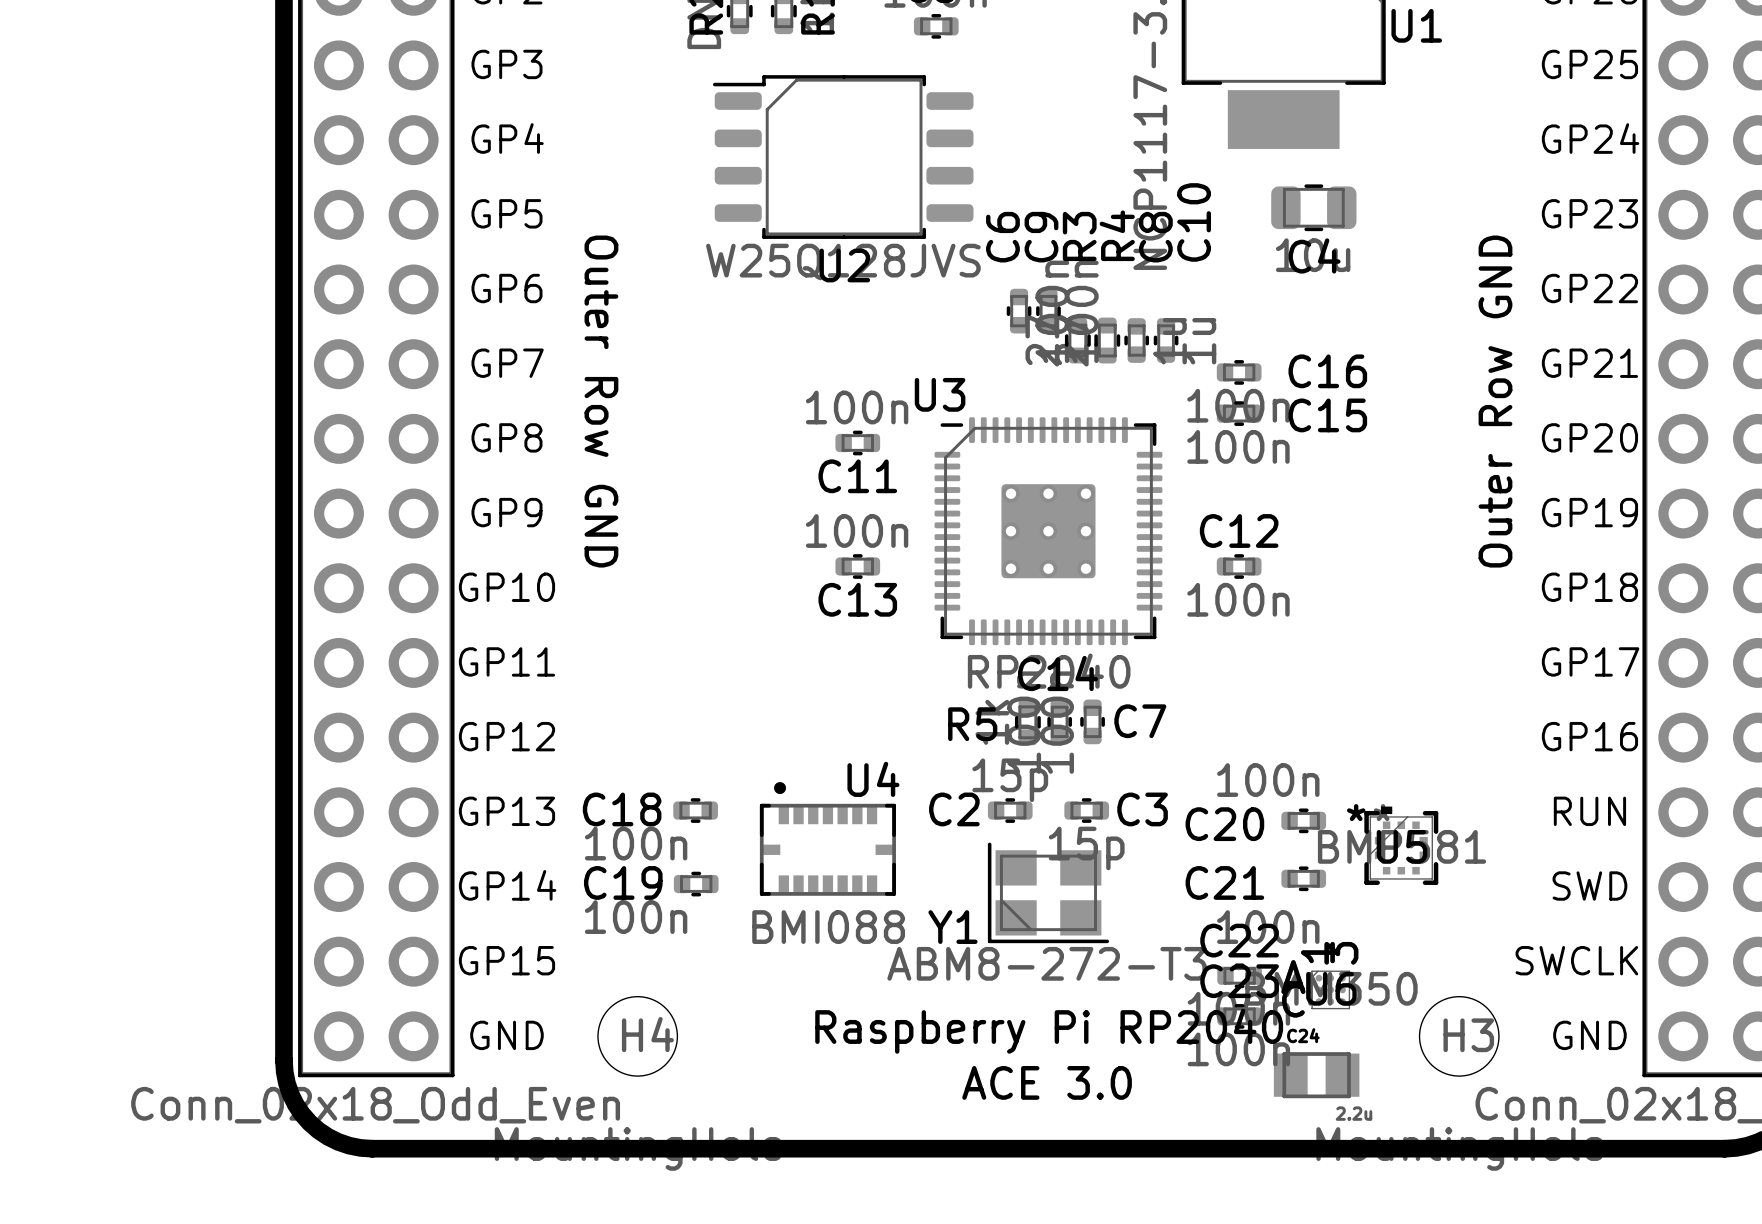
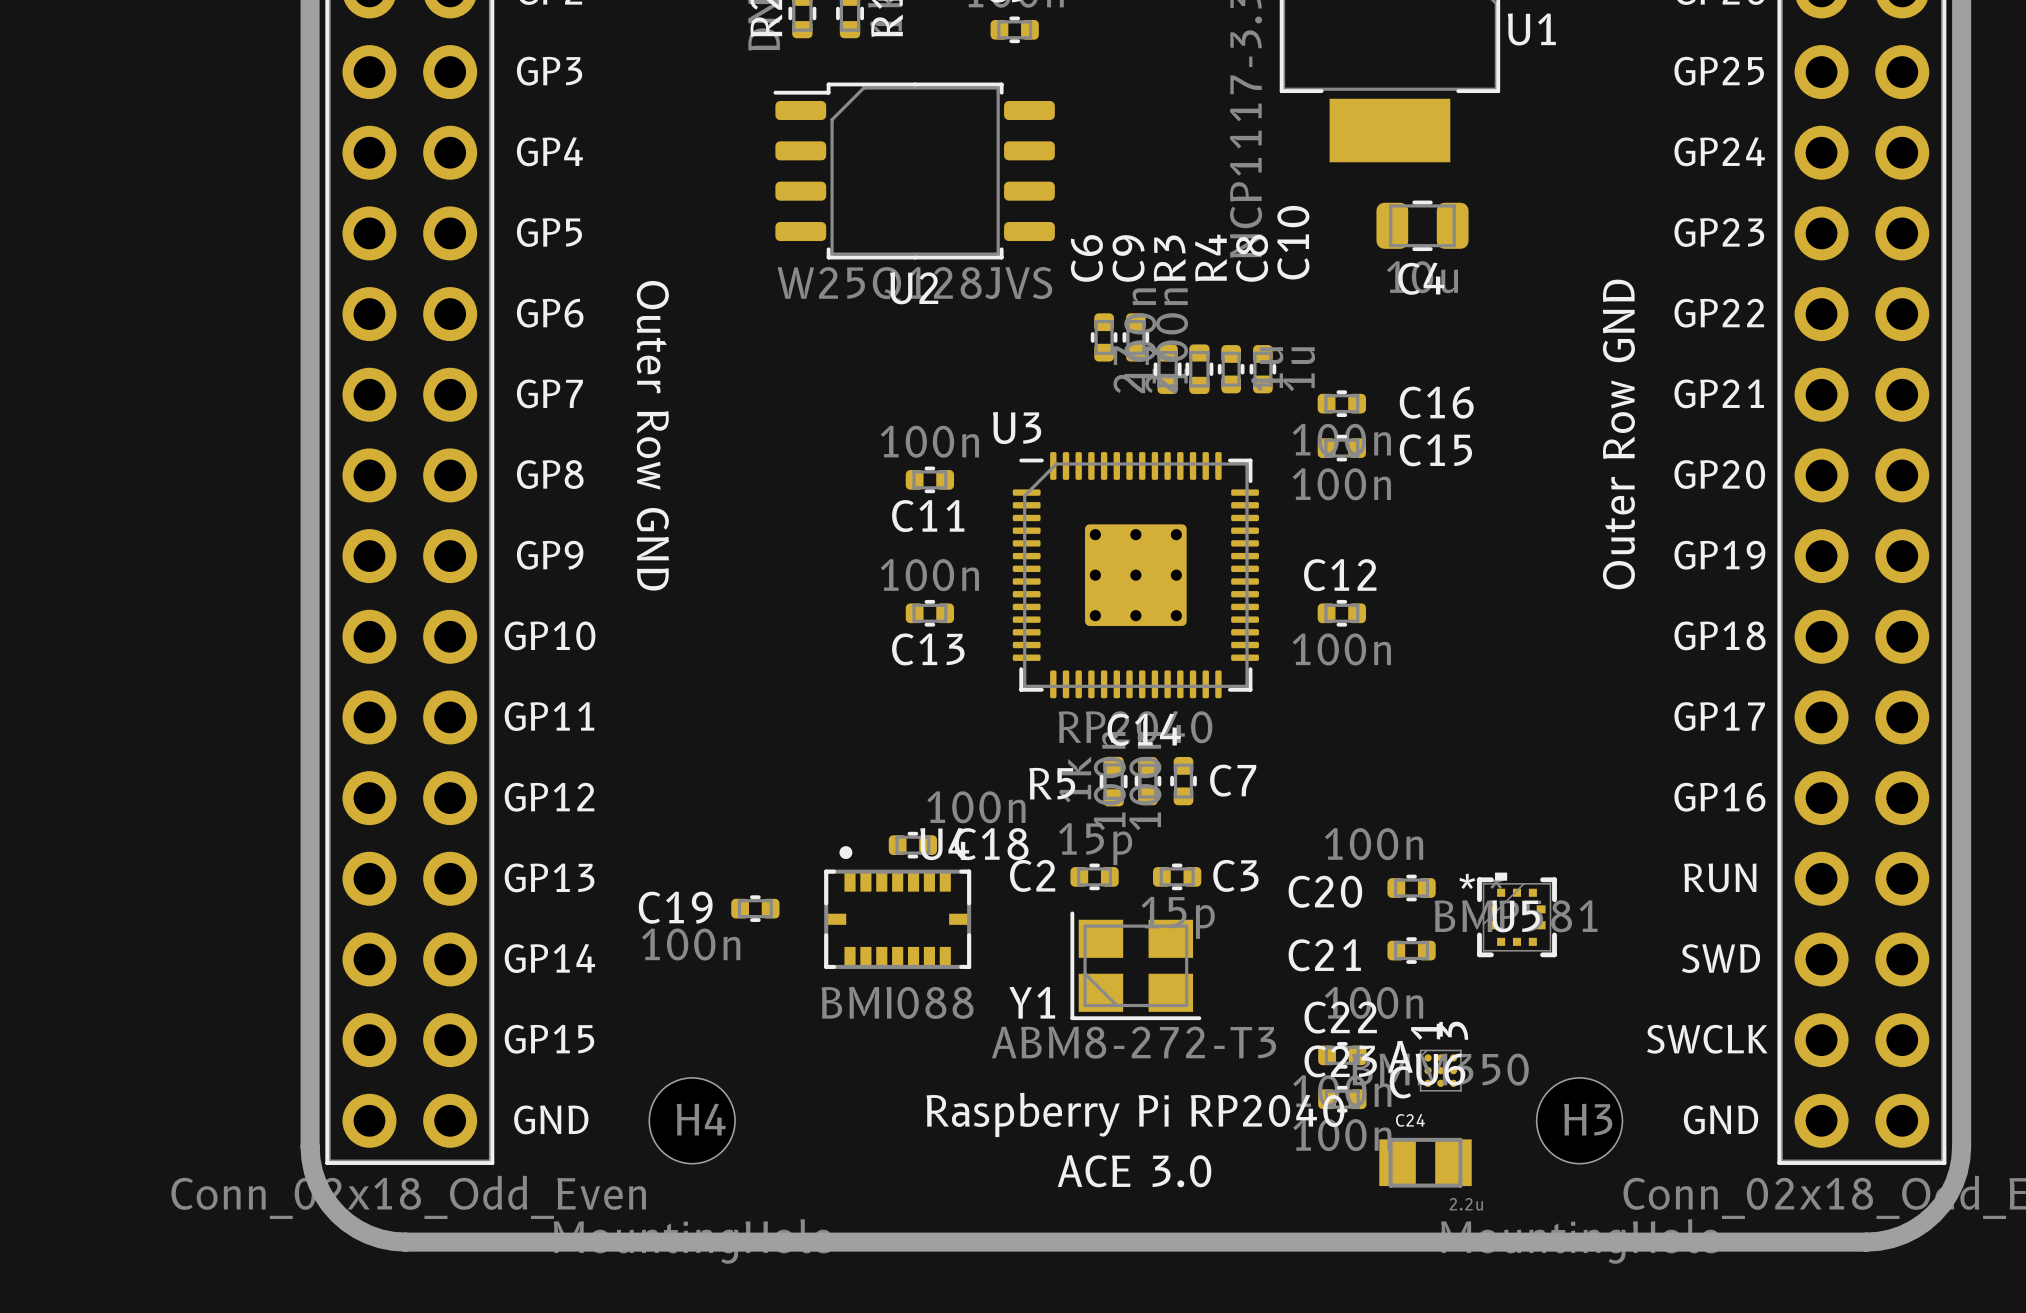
C18 name position: C18 (622, 809) -> C18 (991, 844)
C18 position: (695, 810) -> (912, 845)
C18 value position: 100n (636, 843) -> 100n (976, 807)
C19 position: (696, 884) -> (755, 908)

